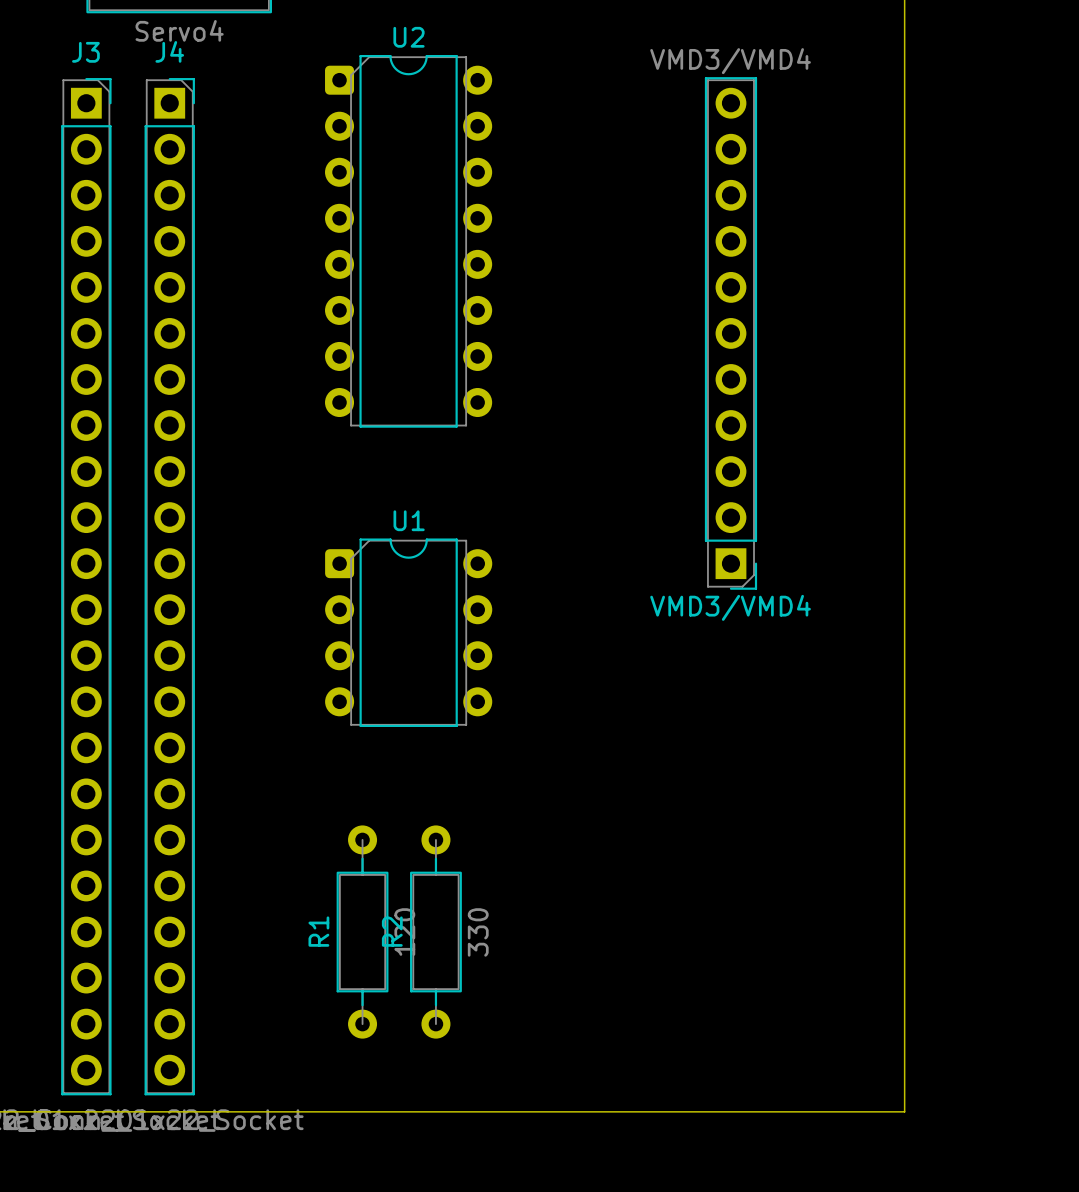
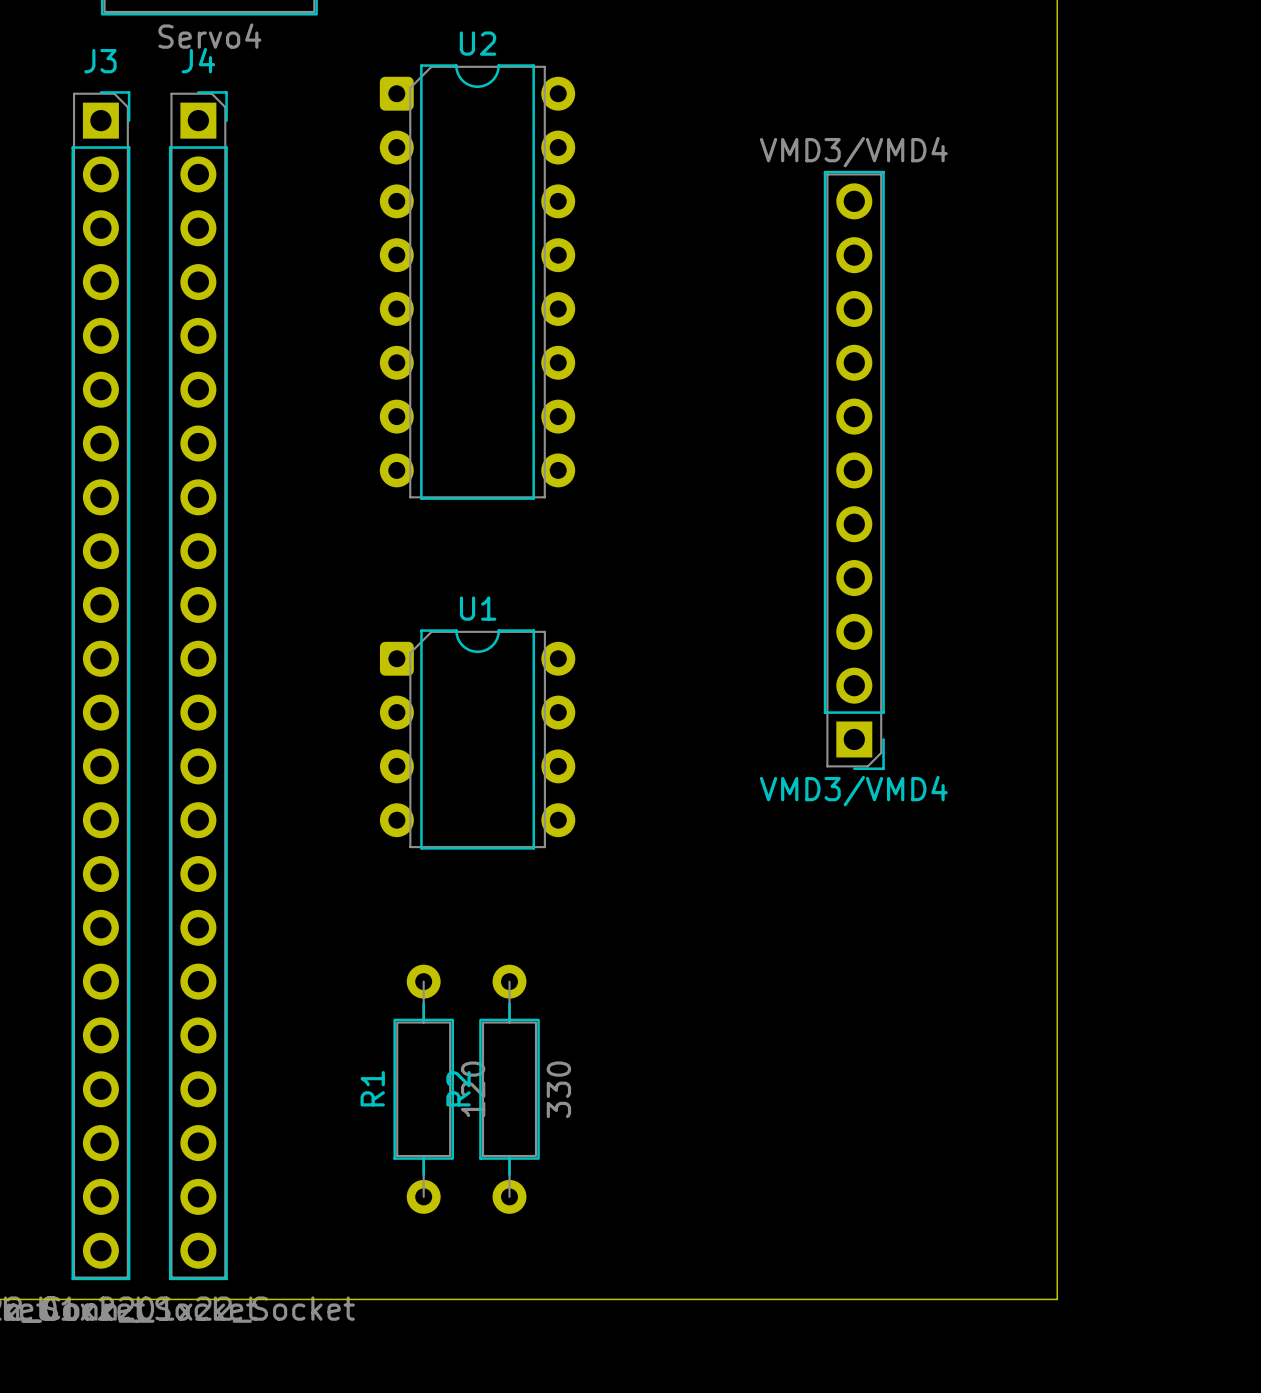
VMD3/VMD4 position: (730, 333) -> (854, 470)

